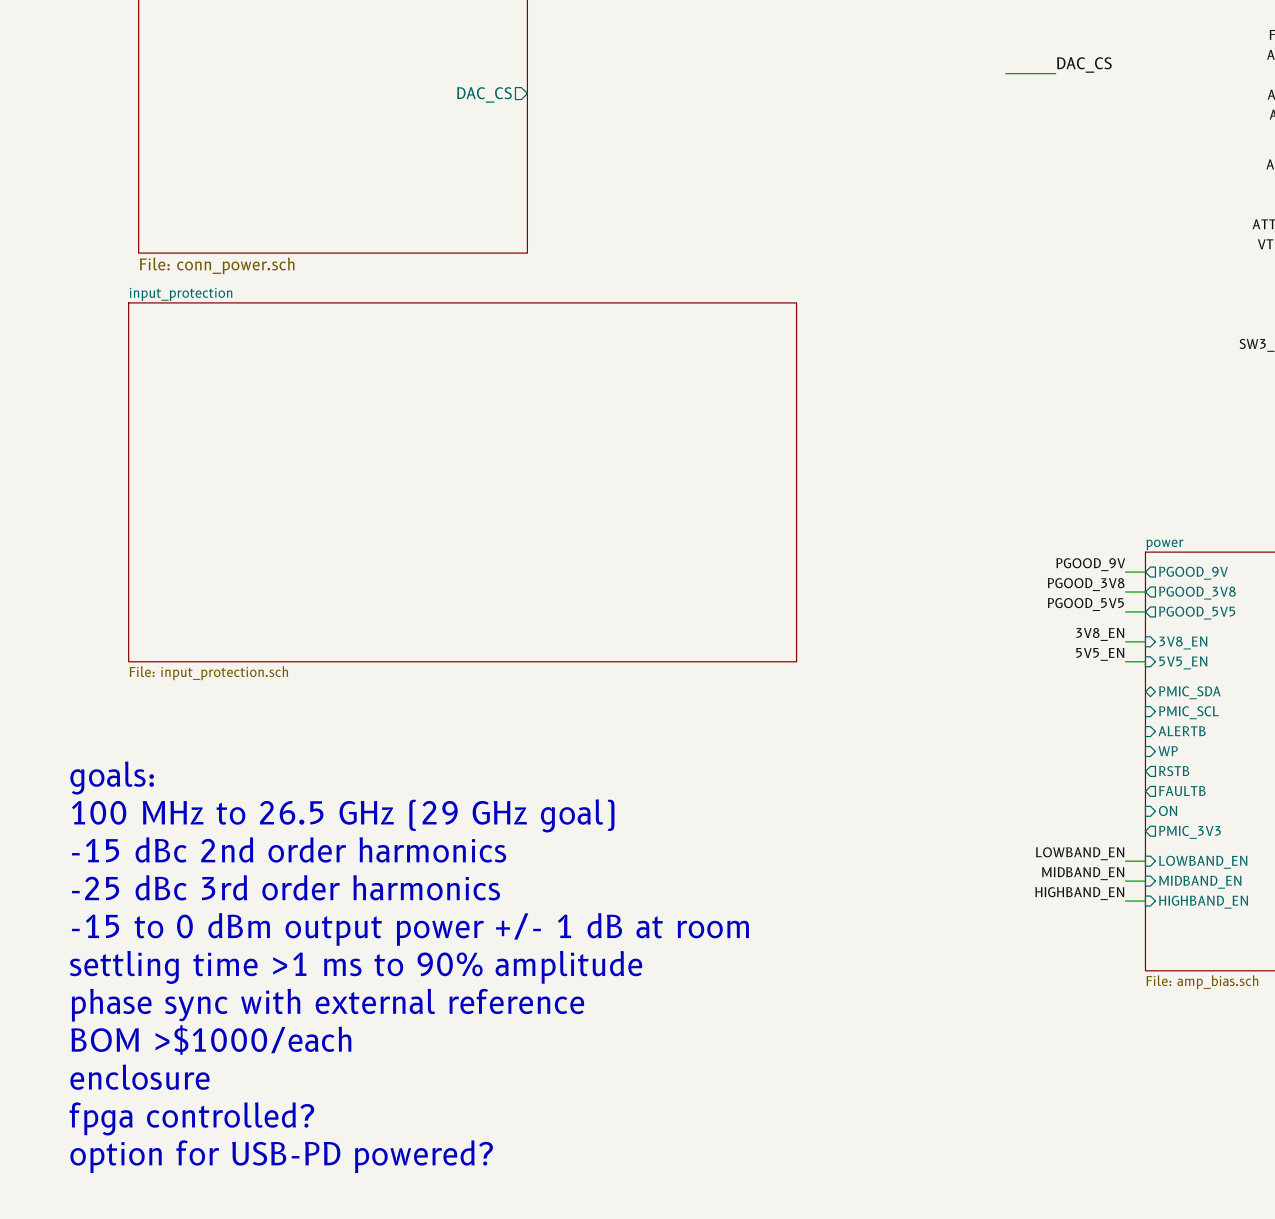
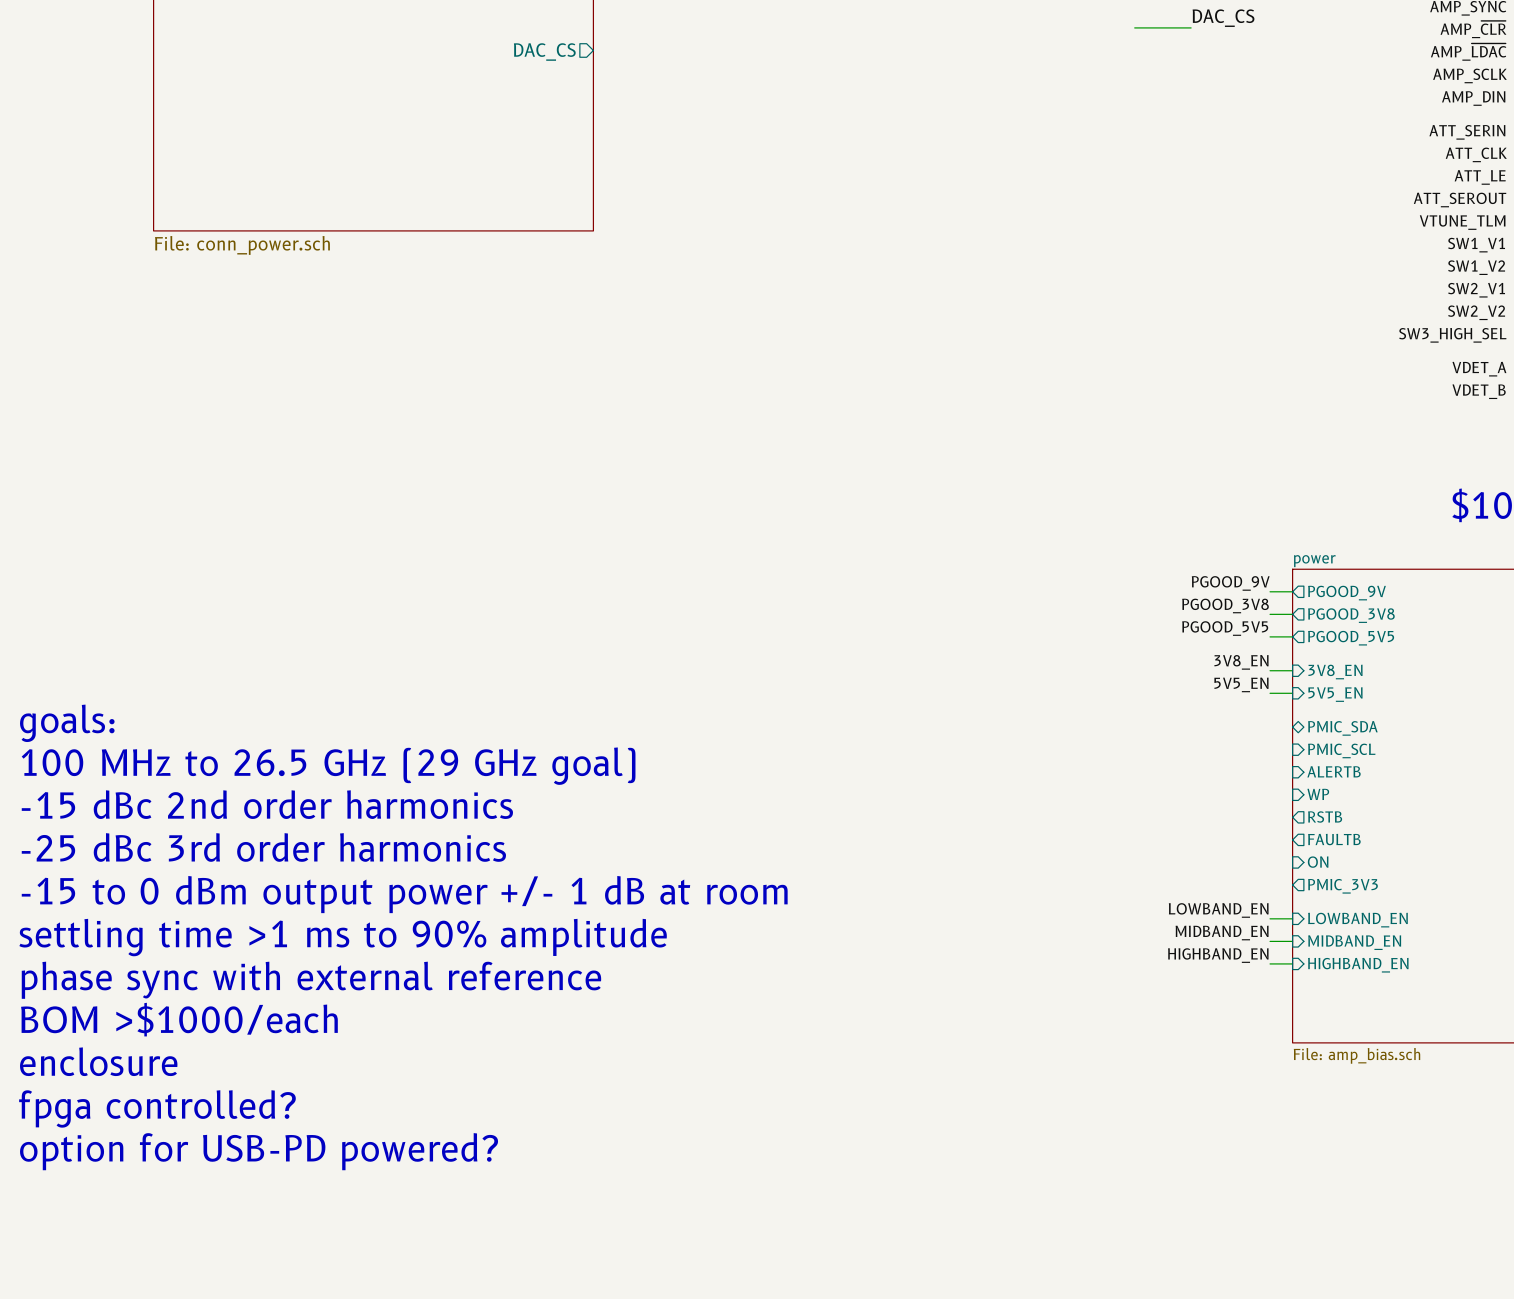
sheet input_protection: File: input_protection.sch (462, 482) -> none
text position: goals: (112, 778) -> goals: (67, 723)
text position: 100 MHz to 26.5 GHz (29 GHz goal) (343, 815) -> 100 MHz to 26.5 GHz (29 GHz goal) (328, 766)
text position: -15 dBc 2nd order harmonics (289, 849) -> -15 dBc 2nd order harmonics (267, 804)
text position: -25 dBc 3rd order harmonics (285, 887) -> -25 dBc 3rd order harmonics (263, 847)
text position: -15 to 0 dBm output power +/- 1 dB at room (410, 929) -> -15 to 0 dBm output power +/- 1 dB at room (404, 894)
text position: settling time >1 ms to 90% amplitude (356, 967) -> settling time >1 ms to 90% amplitude (343, 937)
text position: phase sync with external reference (328, 1005) -> phase sync with external reference (311, 980)
text position: BOM >$1000/each (211, 1039) -> BOM >$1000/each (179, 1019)
text position: enclosure (139, 1077) -> enclosure (98, 1061)
text position: fpga controlled? (191, 1118) -> fpga controlled? (157, 1108)
text position: option for USB-PD powered? (281, 1156) -> option for USB-PD powered? (259, 1151)

